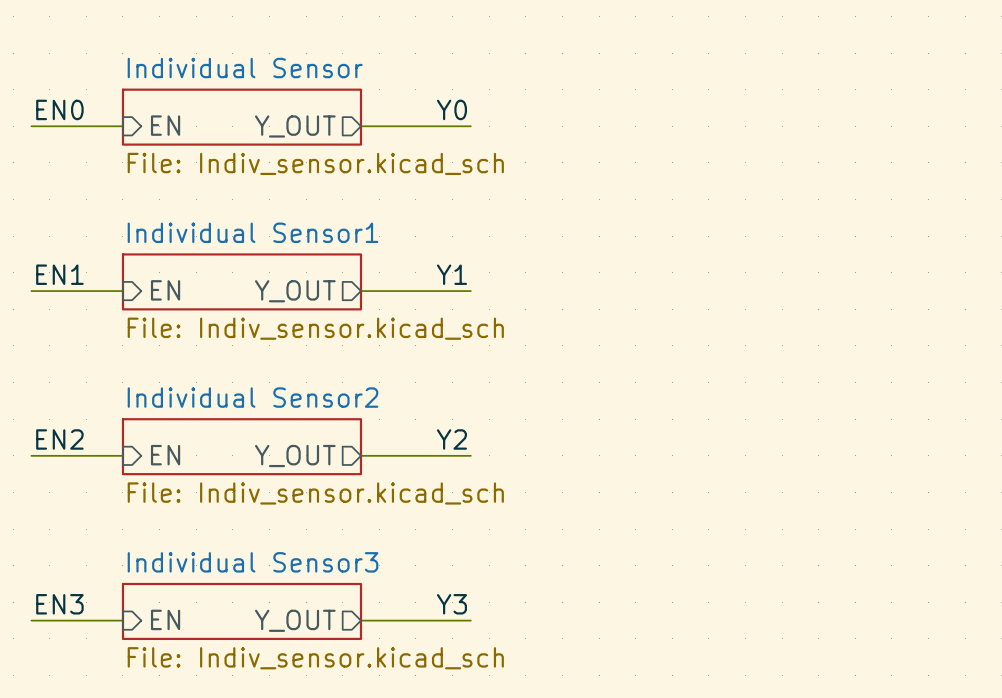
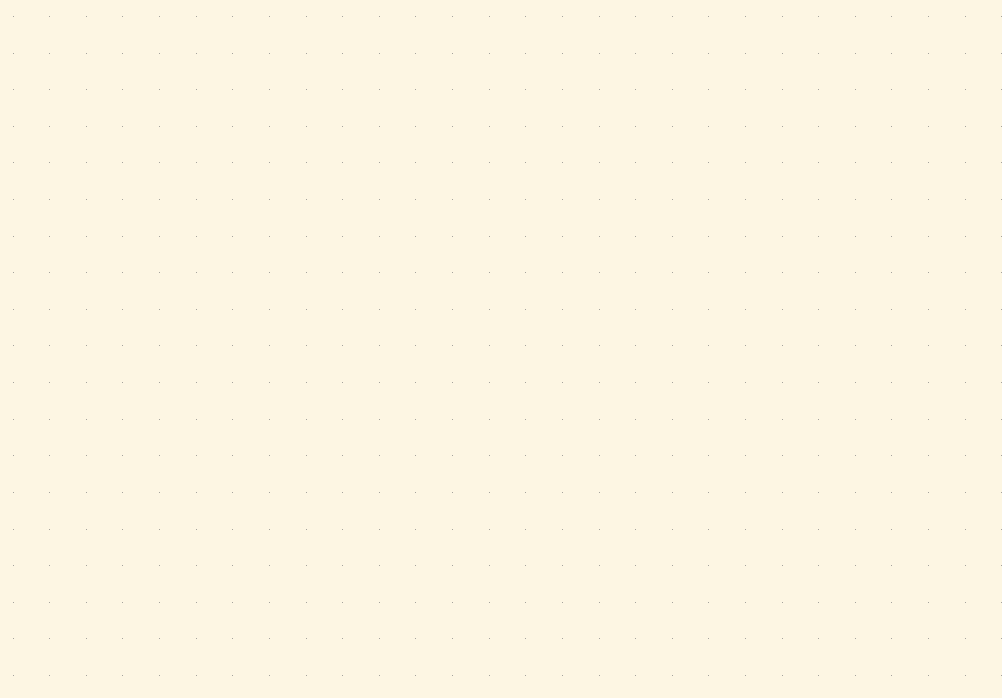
label: EN0 (59, 109) -> none
label: Y0 (451, 109) -> none
sheet Individual Sensor: File: Indiv_sensor.kicad_sch (241, 117) -> none
sheet pin: EN (165, 125) -> none
wire: (31, 126) (122, 126) -> none
sheet pin: Y_OUT (295, 126) -> none
wire: (360, 126) (470, 126) -> none
label: EN1 (59, 274) -> none
label: Y1 (451, 274) -> none
sheet Individual Sensor1: File: Indiv_sensor.kicad_sch (241, 281) -> none
sheet pin: EN (165, 290) -> none
wire: (31, 291) (122, 291) -> none
sheet pin: Y_OUT (295, 291) -> none
wire: (360, 291) (470, 291) -> none
label: EN2 (59, 439) -> none
label: Y2 (451, 439) -> none
sheet Individual Sensor2: File: Indiv_sensor.kicad_sch (241, 446) -> none
wire: (31, 455) (122, 455) -> none
sheet pin: EN (165, 455) -> none
wire: (360, 455) (470, 455) -> none
sheet pin: Y_OUT (295, 456) -> none
label: EN3 (59, 604) -> none
label: Y3 (451, 604) -> none
sheet Individual Sensor3: File: Indiv_sensor.kicad_sch (241, 611) -> none
sheet pin: EN (165, 619) -> none
wire: (31, 620) (122, 620) -> none
sheet pin: Y_OUT (295, 620) -> none
wire: (360, 620) (470, 620) -> none

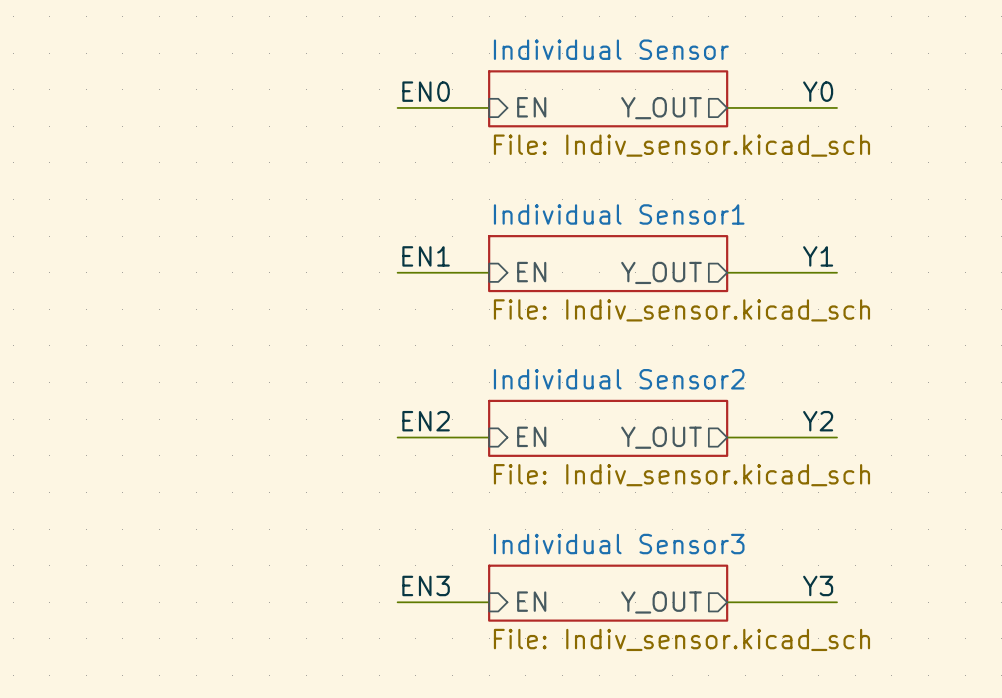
label: none -> EN0 (426, 91)
label: none -> Y0 (818, 91)
sheet Individual Sensor: none -> File: Indiv_sensor.kicad_sch (608, 98)
wire: none -> (397, 107) (489, 107)
sheet pin: none -> EN (531, 107)
wire: none -> (727, 107) (837, 107)
sheet pin: none -> Y_OUT (661, 108)
label: none -> EN1 (426, 256)
label: none -> Y1 (818, 256)
sheet Individual Sensor1: none -> File: Indiv_sensor.kicad_sch (608, 263)
wire: none -> (397, 272) (489, 272)
sheet pin: none -> EN (531, 272)
sheet pin: none -> Y_OUT (661, 272)
wire: none -> (727, 272) (837, 272)
label: none -> EN2 (426, 421)
label: none -> Y2 (818, 421)
sheet Individual Sensor2: none -> File: Indiv_sensor.kicad_sch (608, 428)
sheet pin: none -> EN (531, 436)
wire: none -> (397, 437) (489, 437)
sheet pin: none -> Y_OUT (661, 437)
wire: none -> (727, 437) (837, 437)
label: none -> EN3 (426, 585)
label: none -> Y3 (818, 585)
sheet Individual Sensor3: none -> File: Indiv_sensor.kicad_sch (608, 593)
sheet pin: none -> EN (531, 601)
wire: none -> (397, 602) (489, 602)
sheet pin: none -> Y_OUT (661, 602)
wire: none -> (727, 602) (837, 602)

